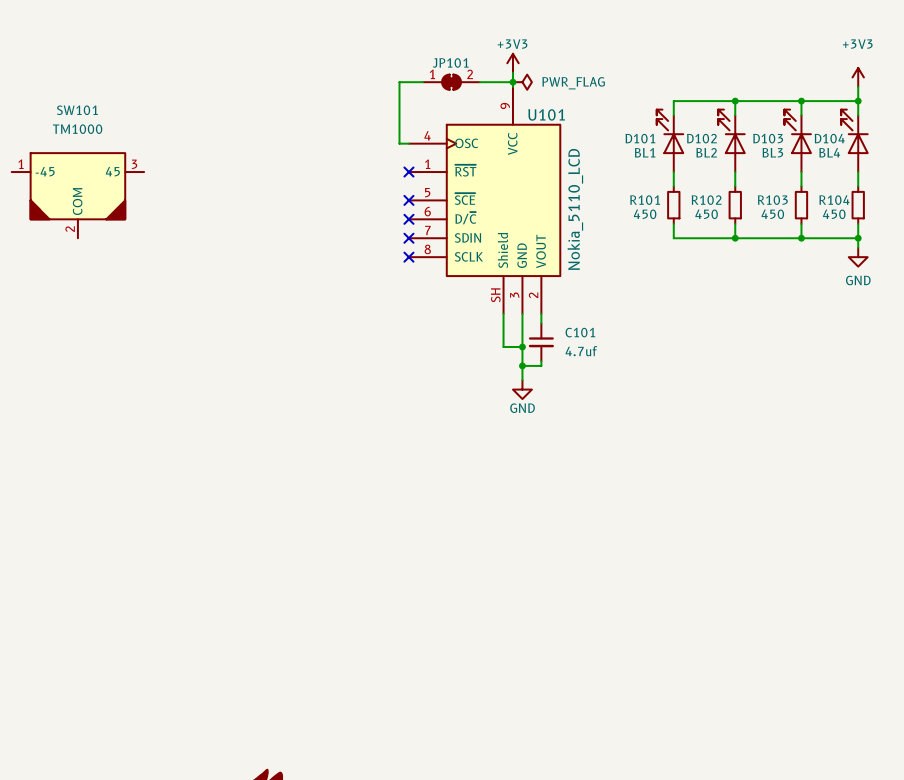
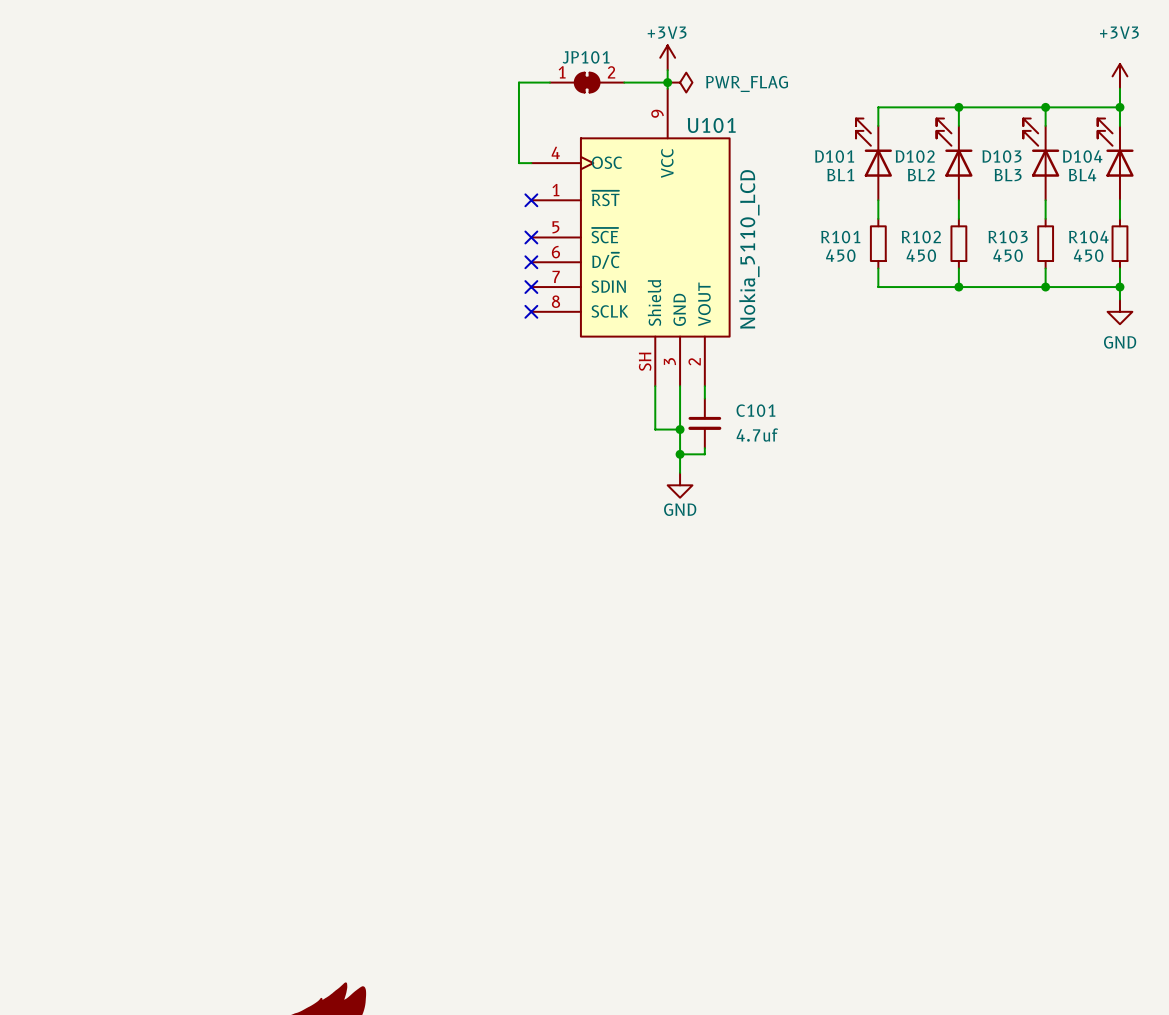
SW101: TM1000 (77, 195) -> none

